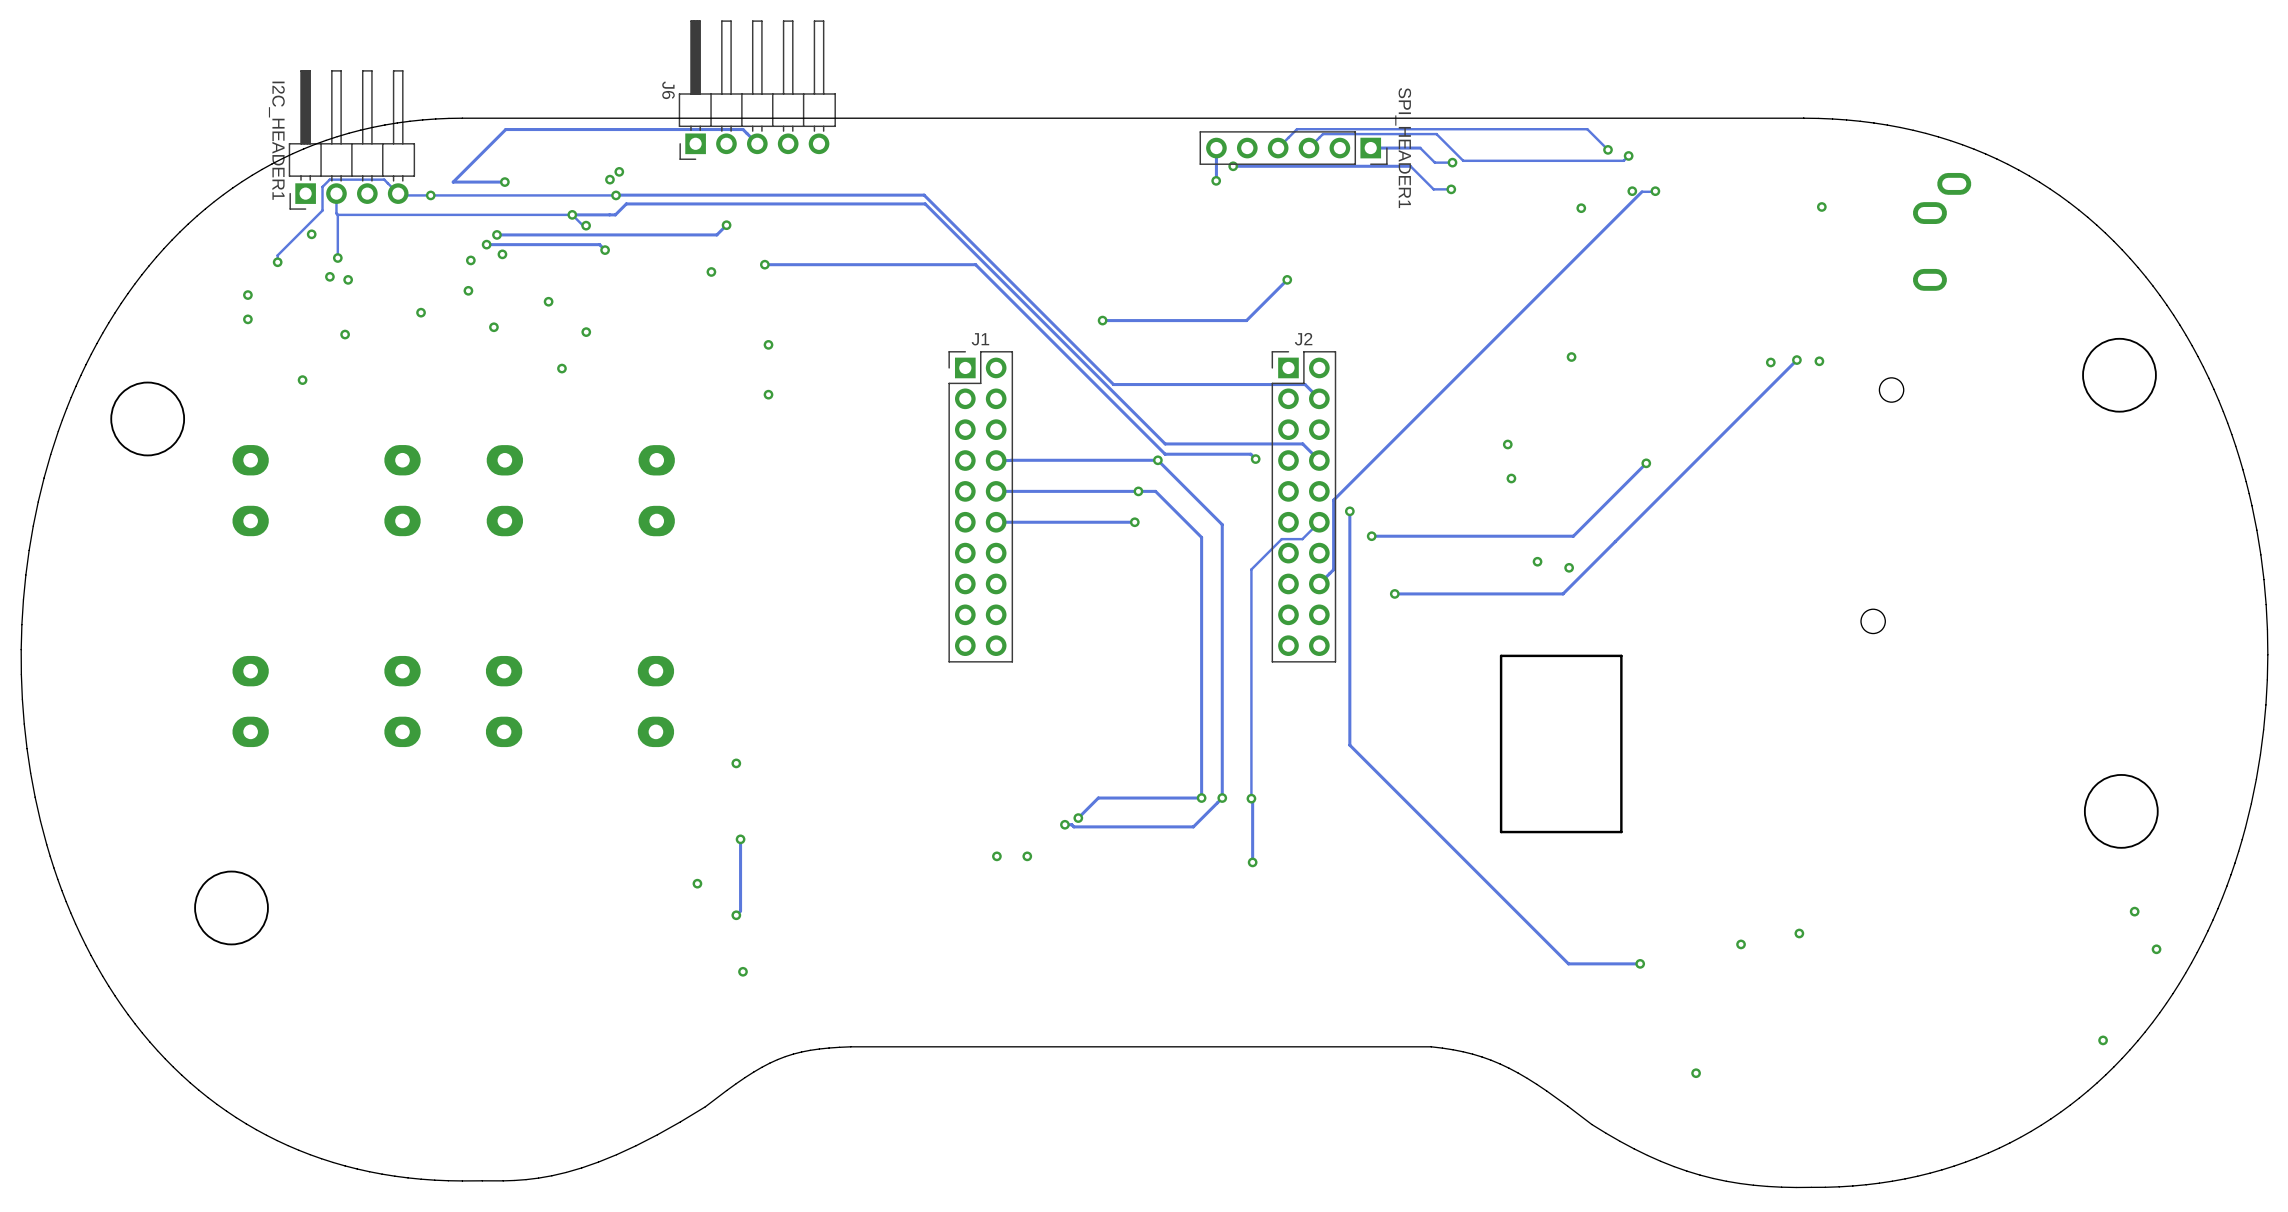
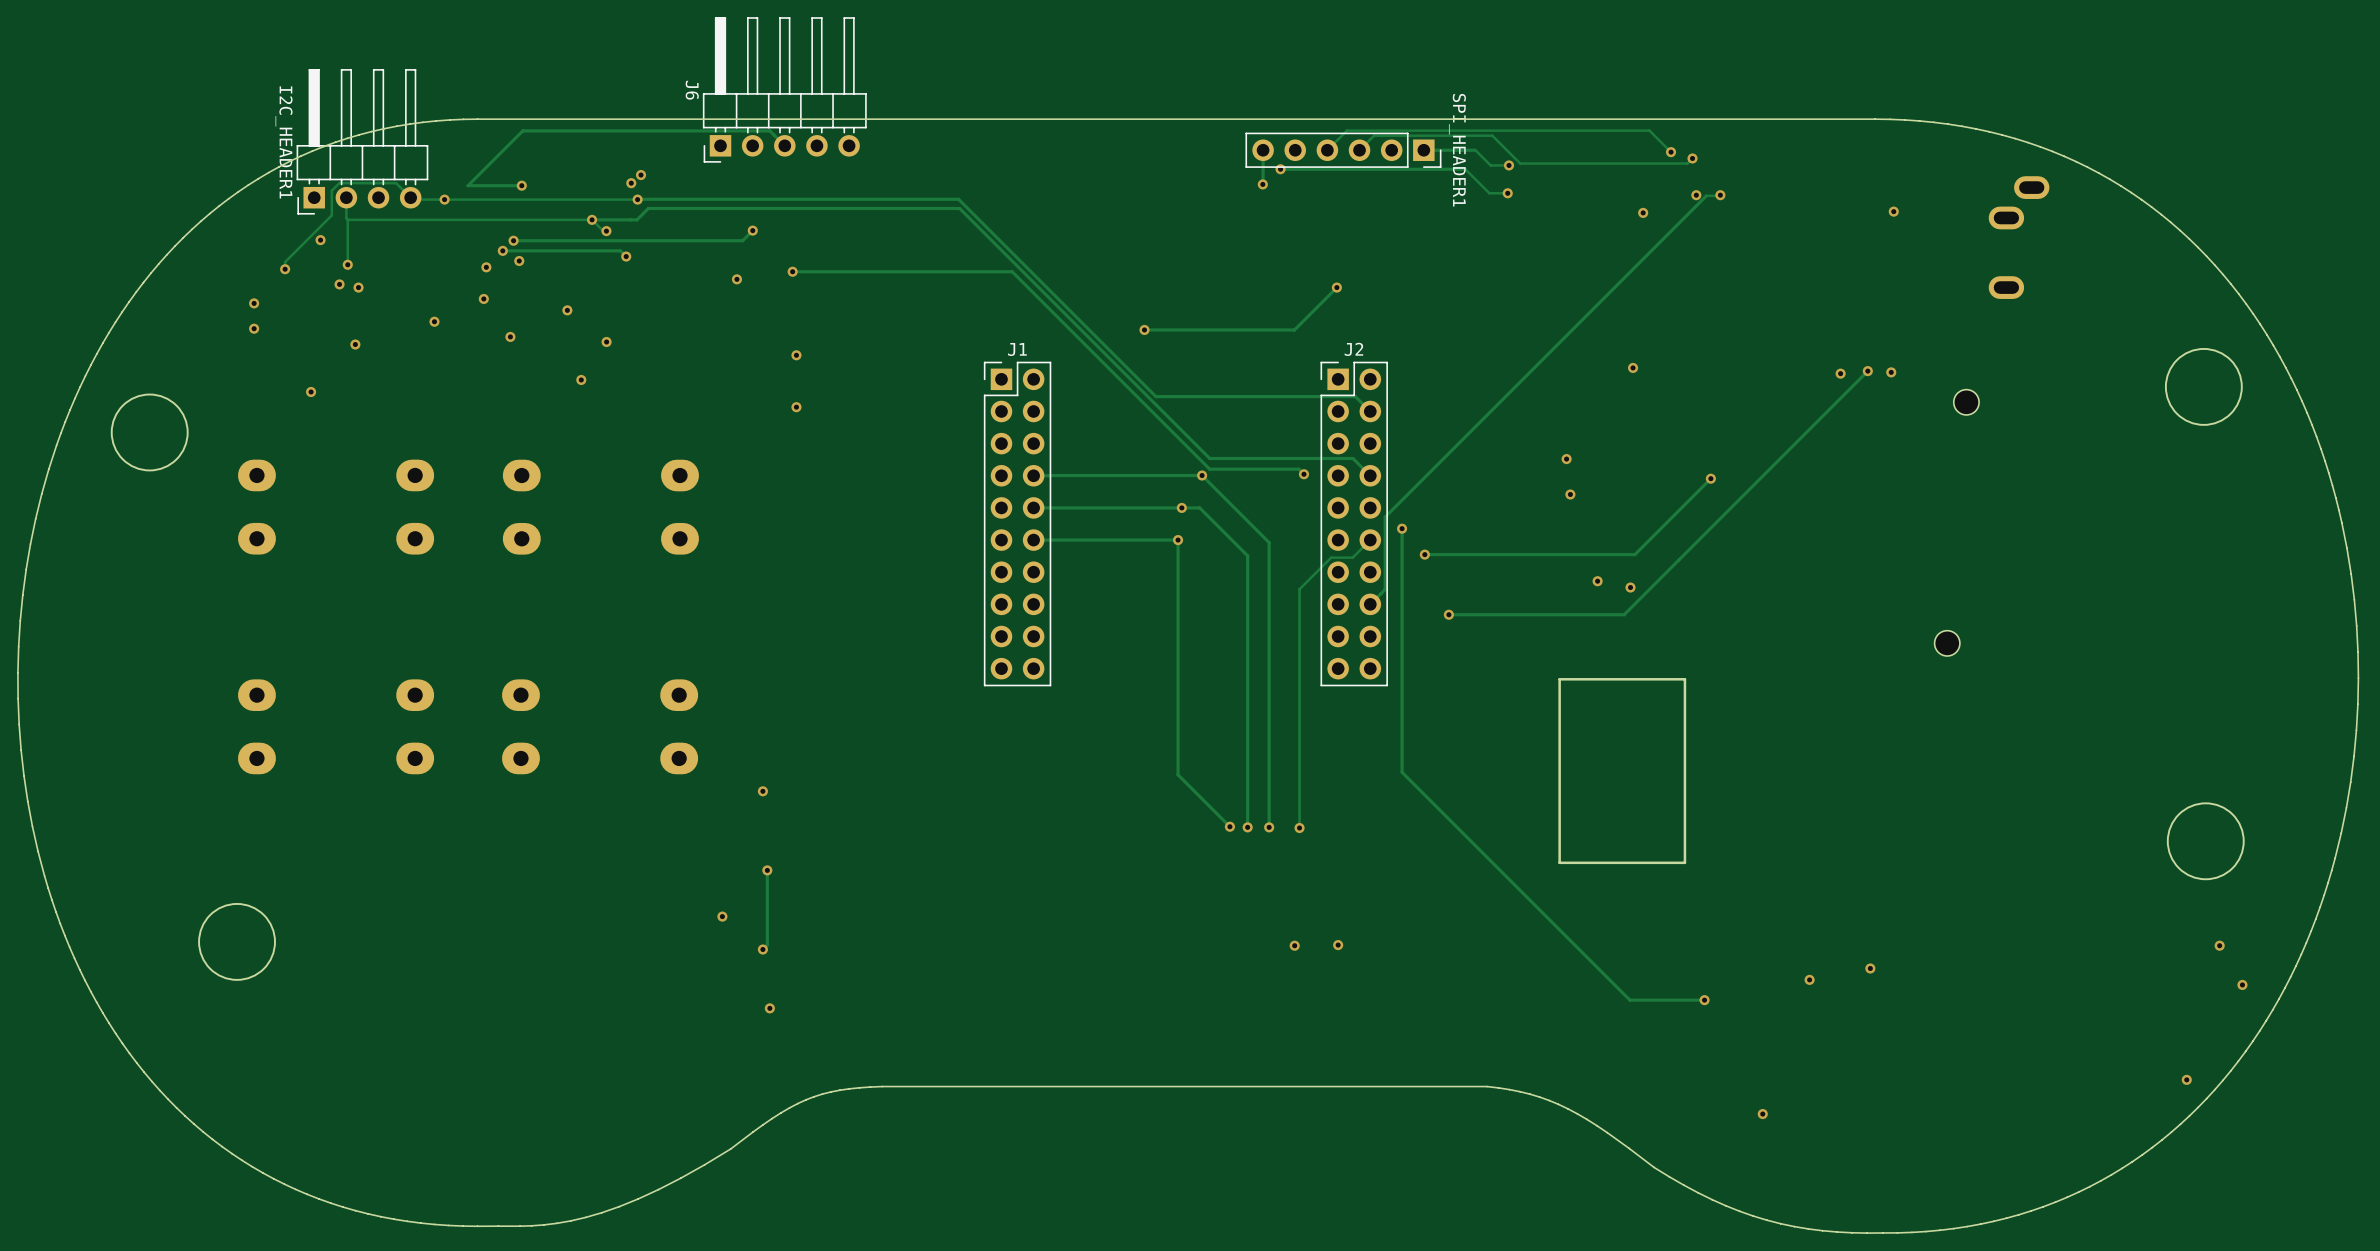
track: none -> (1178, 540) (1178, 774) (1229, 826)
via: none -> (1229, 826)
track: (1201, 798) (1098, 798) (1078, 818) -> none
track: (1222, 798) (1193, 826) (1073, 826) (1071, 824) (1064, 824) -> none
track: (1251, 798) (1252, 862) -> none
via: (1078, 818) -> none
via: (1064, 824) -> none
via: (996, 856) -> none
via: (1027, 856) -> none
via: (1252, 862) -> none
via: none -> (1294, 945)
via: none -> (1338, 945)

